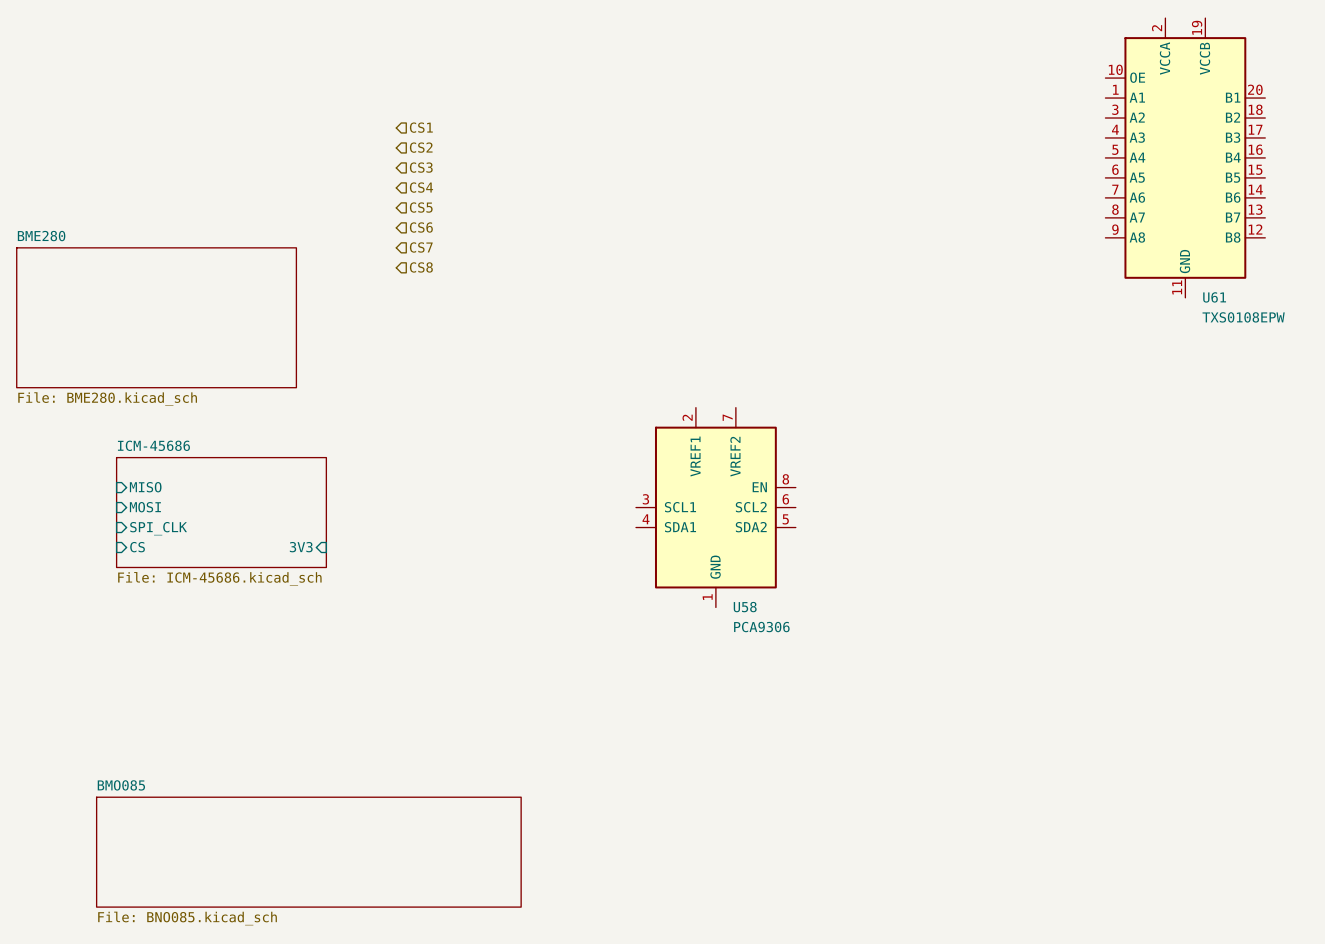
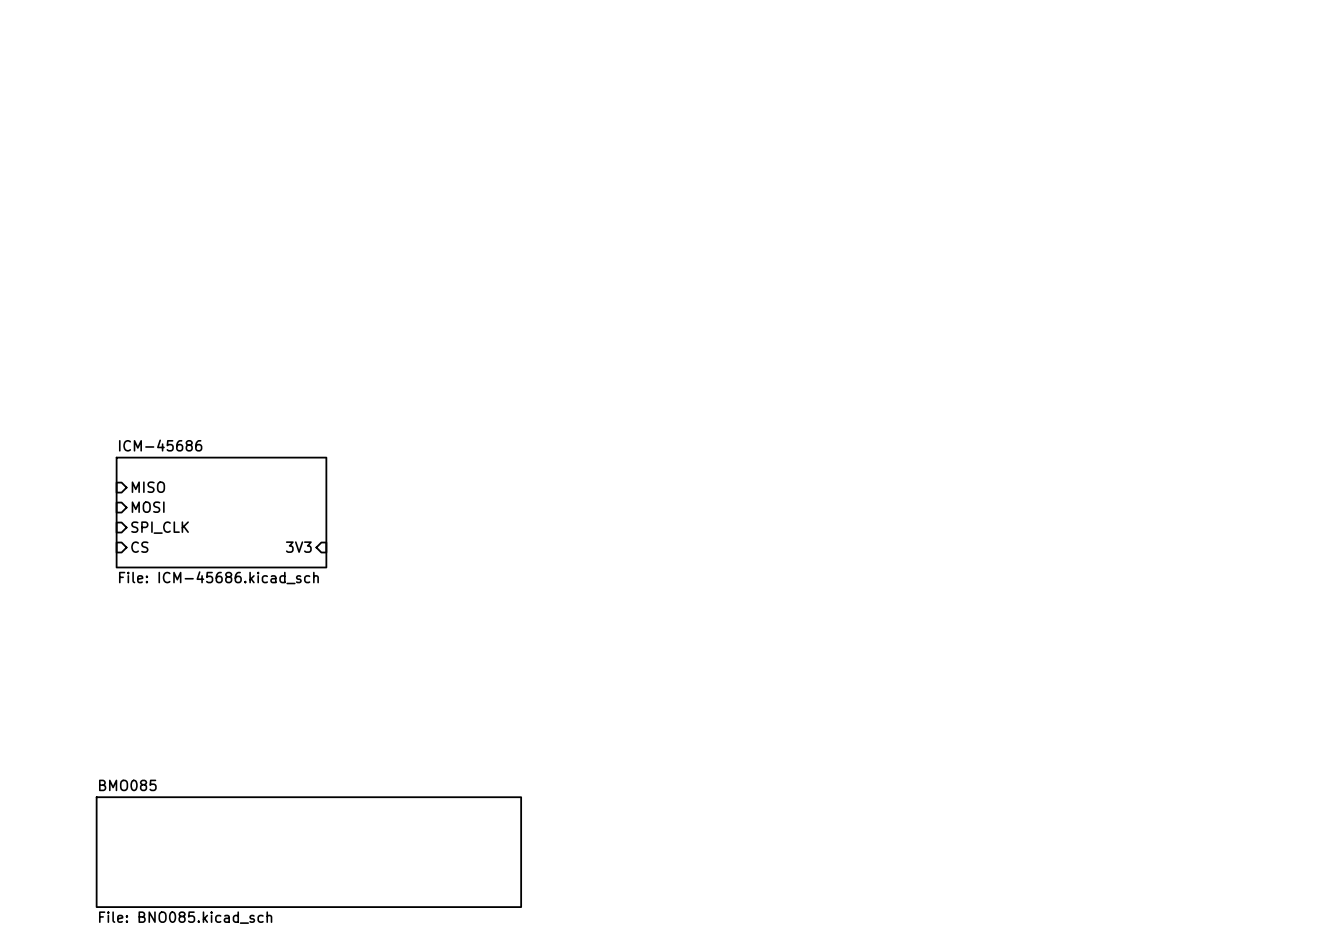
hierarchical label: CS1 (421, 127) -> none
hierarchical label: CS2 (421, 147) -> none
U61: TXS0108EPW (1185, 157) -> none
hierarchical label: CS3 (421, 167) -> none
hierarchical label: CS4 (421, 187) -> none
hierarchical label: CS5 (421, 207) -> none
hierarchical label: CS6 (421, 227) -> none
hierarchical label: CS7 (421, 247) -> none
hierarchical label: CS8 (421, 267) -> none
sheet BME280: File: BME280.kicad_sch (156, 317) -> none
U58: PCA9306 (715, 507) -> none

